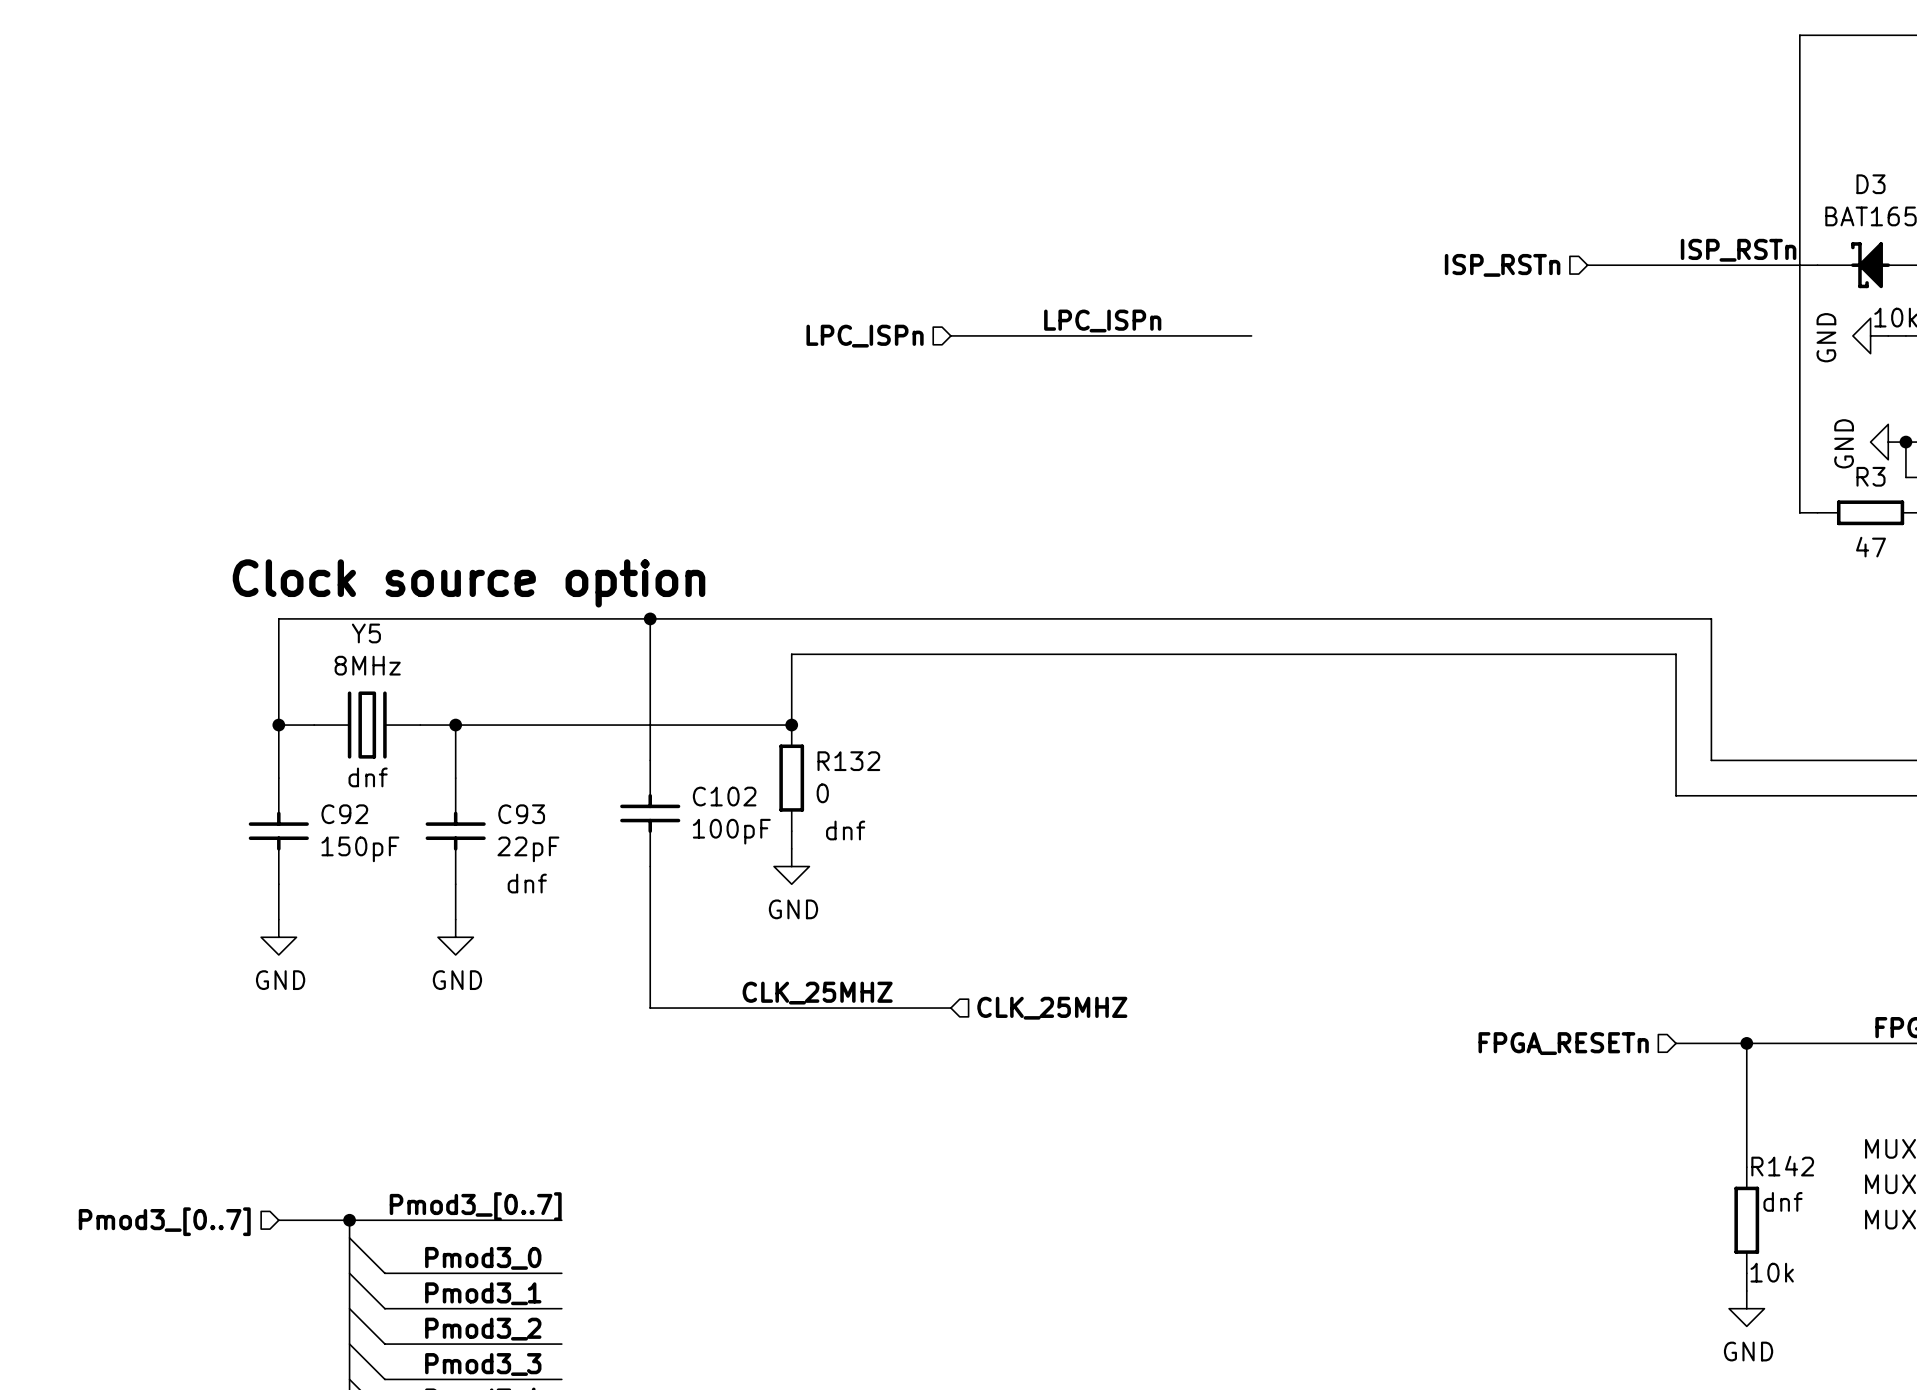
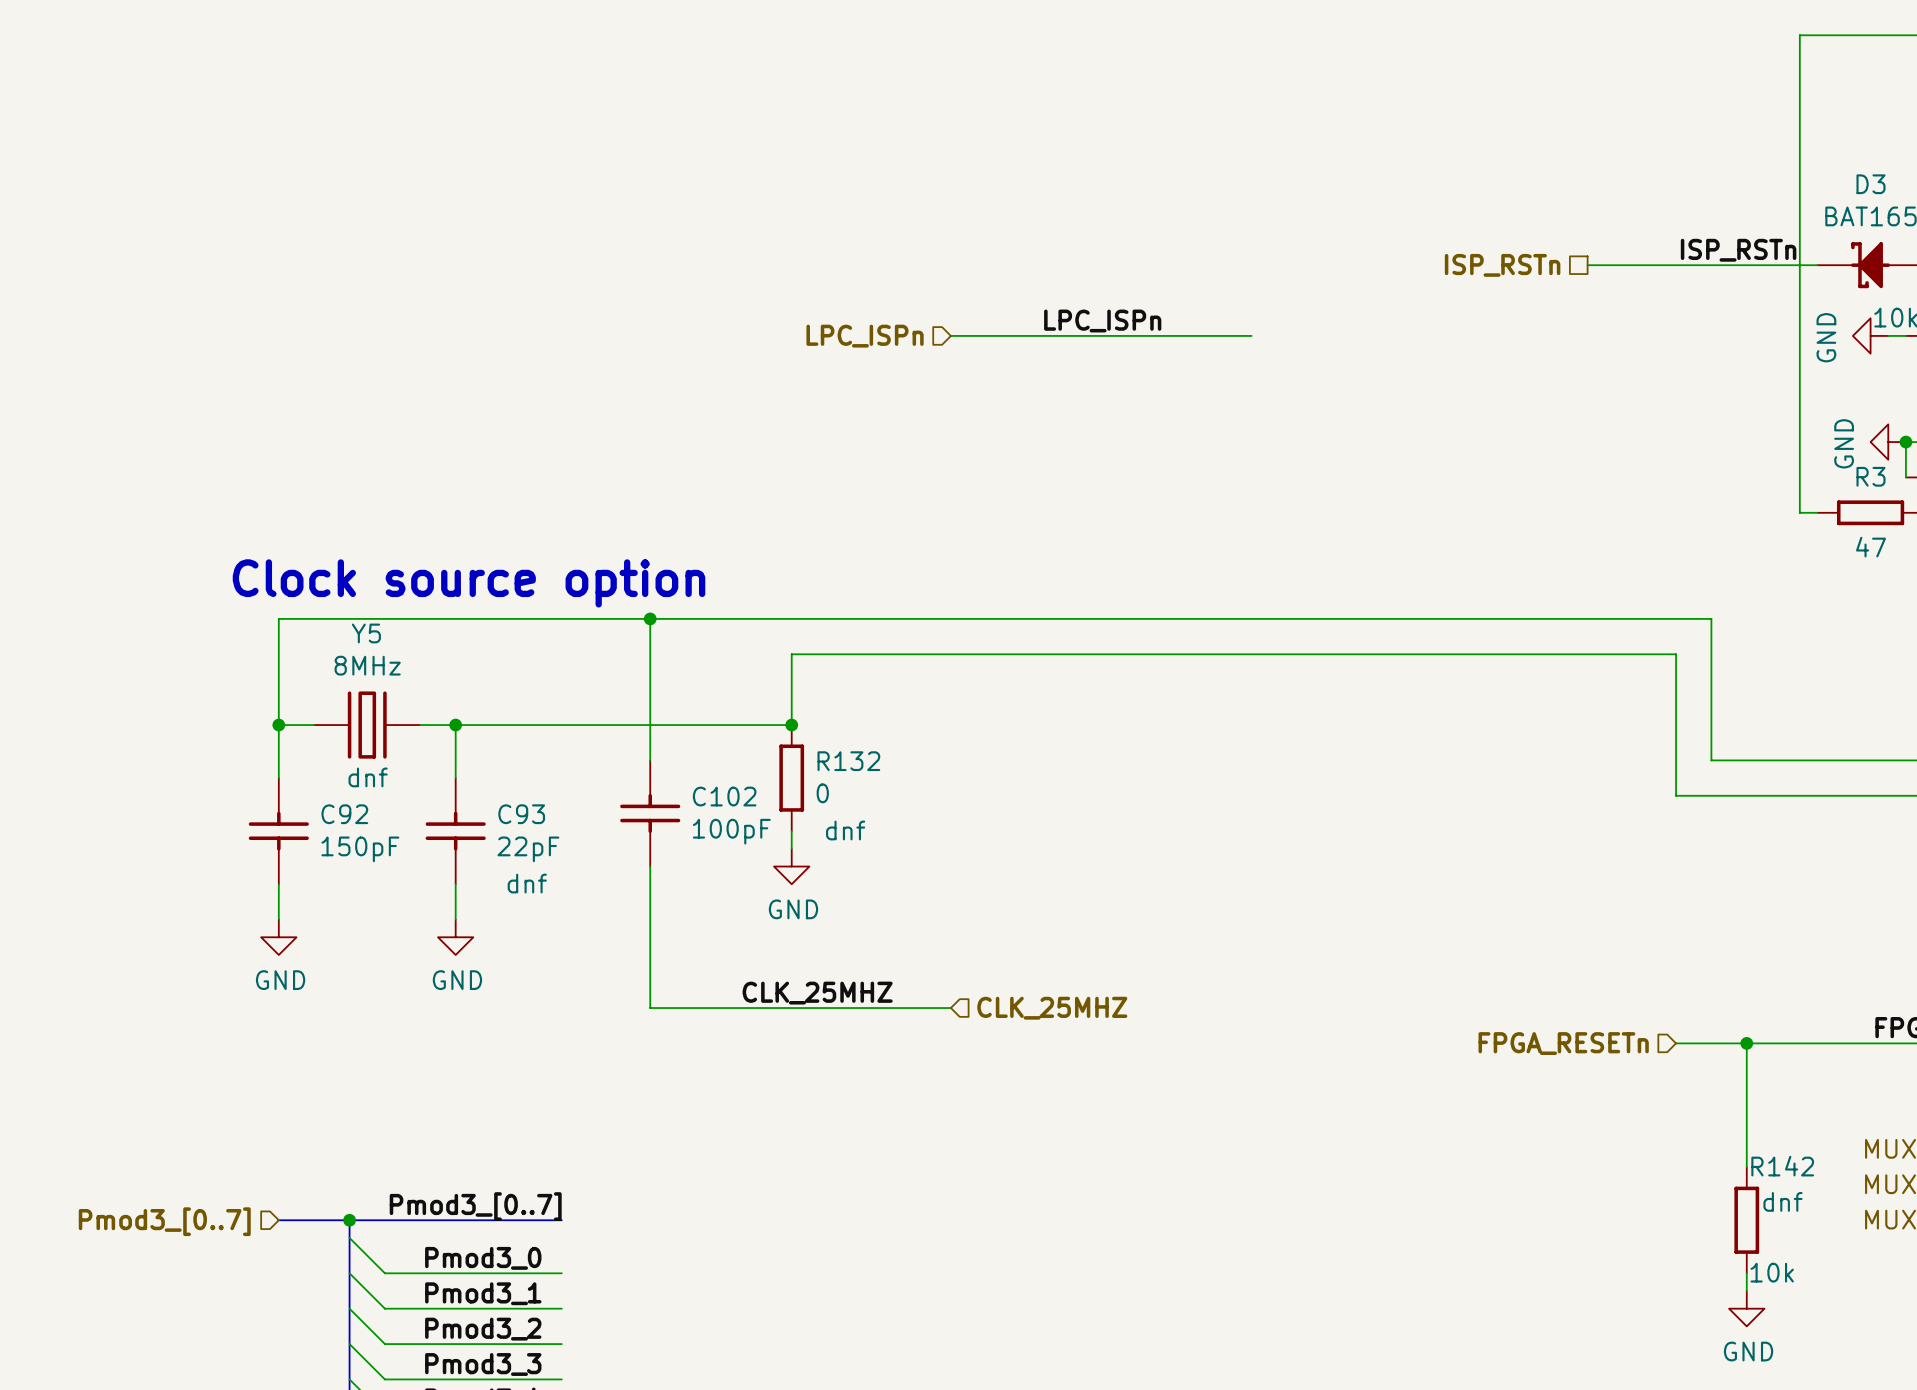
hierarchical label shape: input (1502, 265) -> passive (1502, 265)

